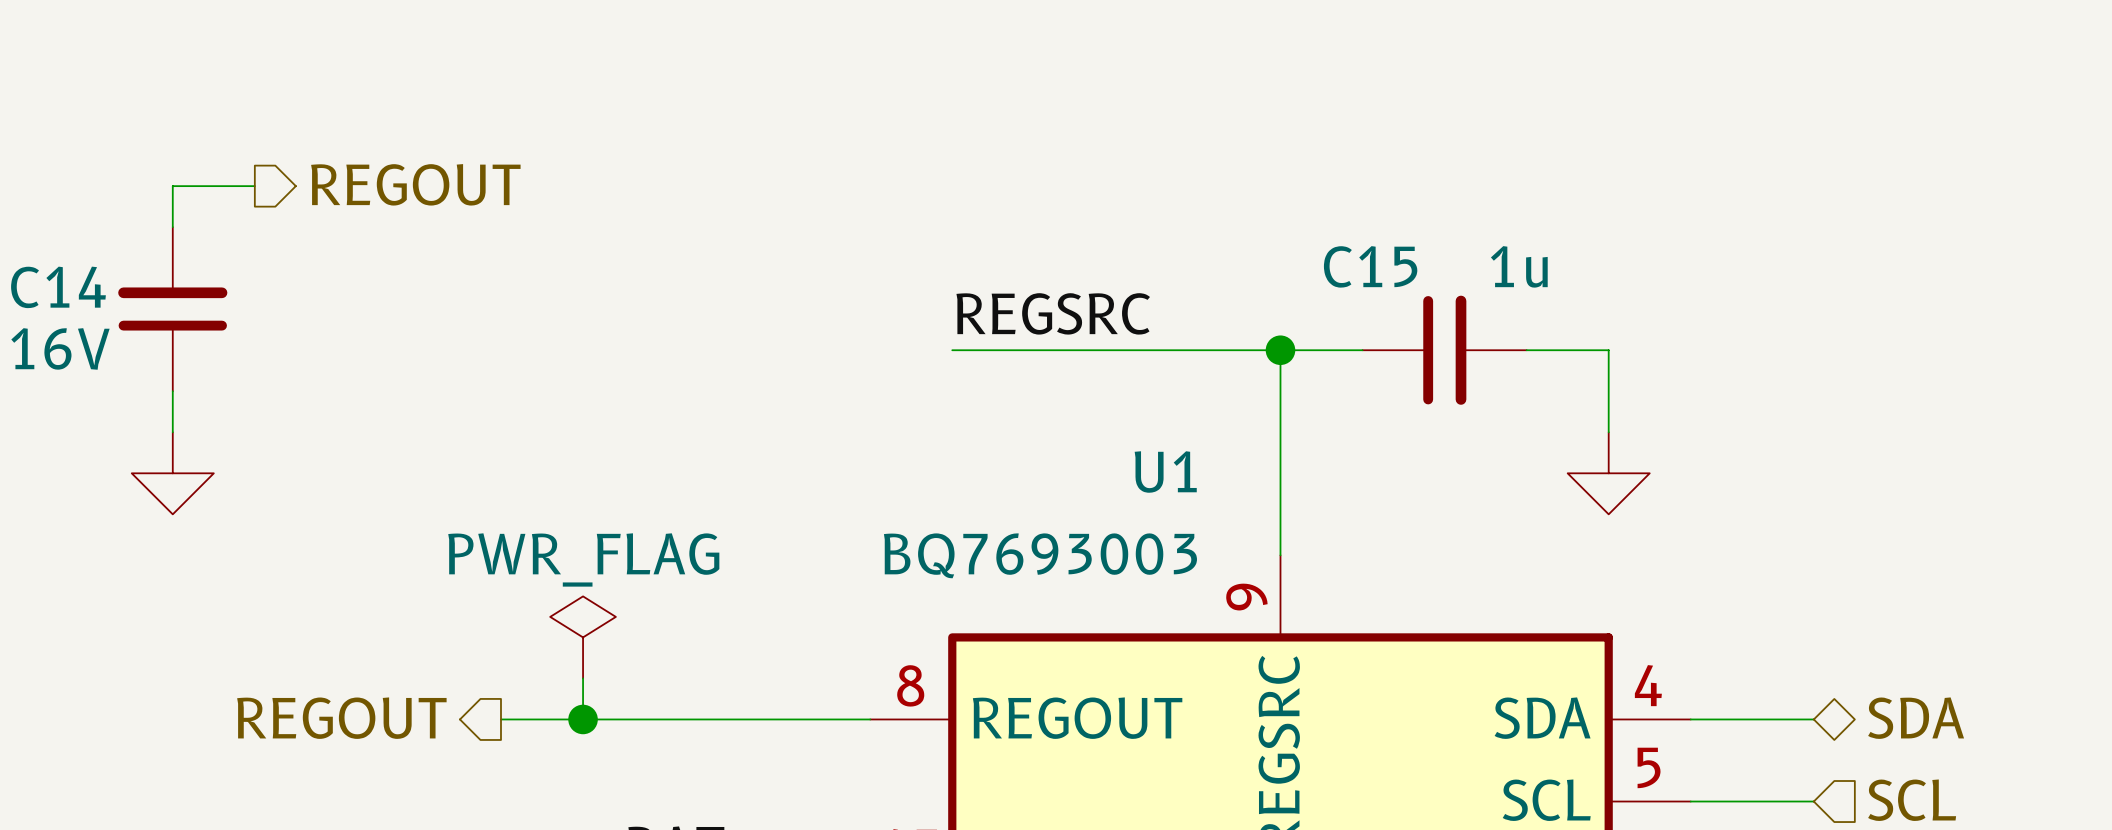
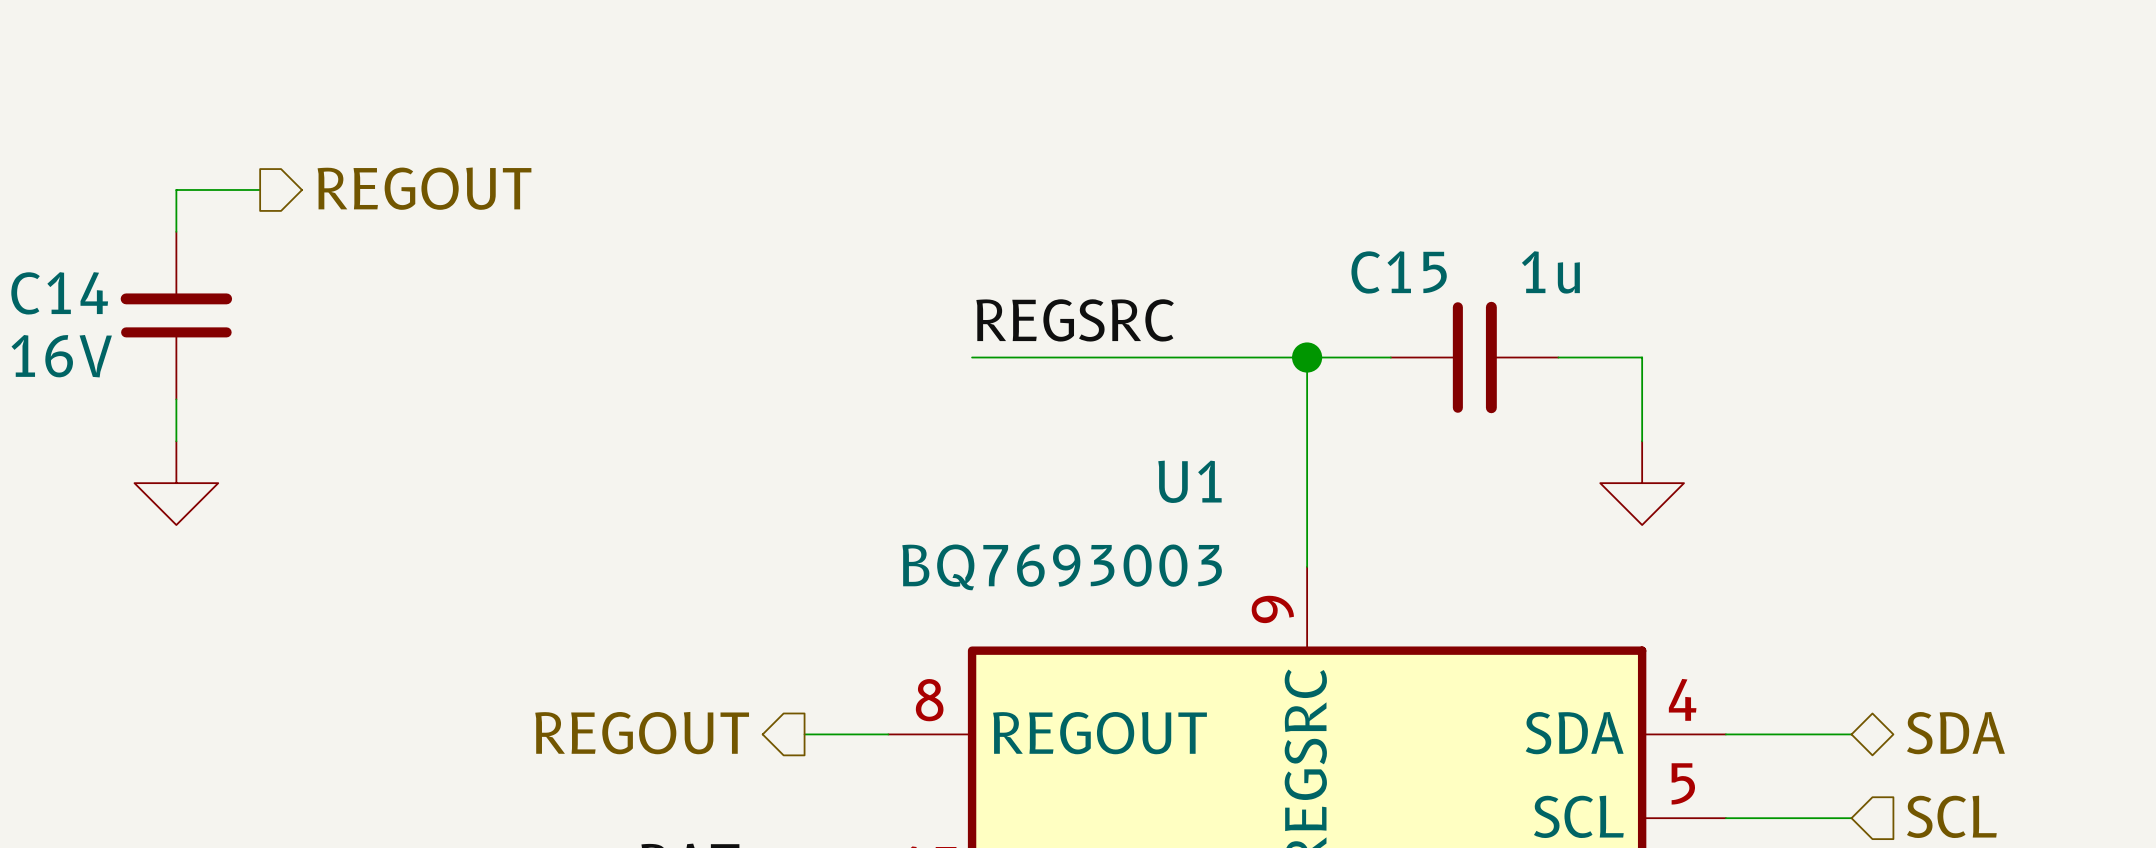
power symbol: PWR_FLAG (583, 637) -> none
wire: (583, 678) (583, 719) -> none
hierarchical label position: REGOUT (341, 718) -> REGOUT (642, 733)
wire: (500, 719) (788, 719) -> none
junction: (583, 719) -> none

